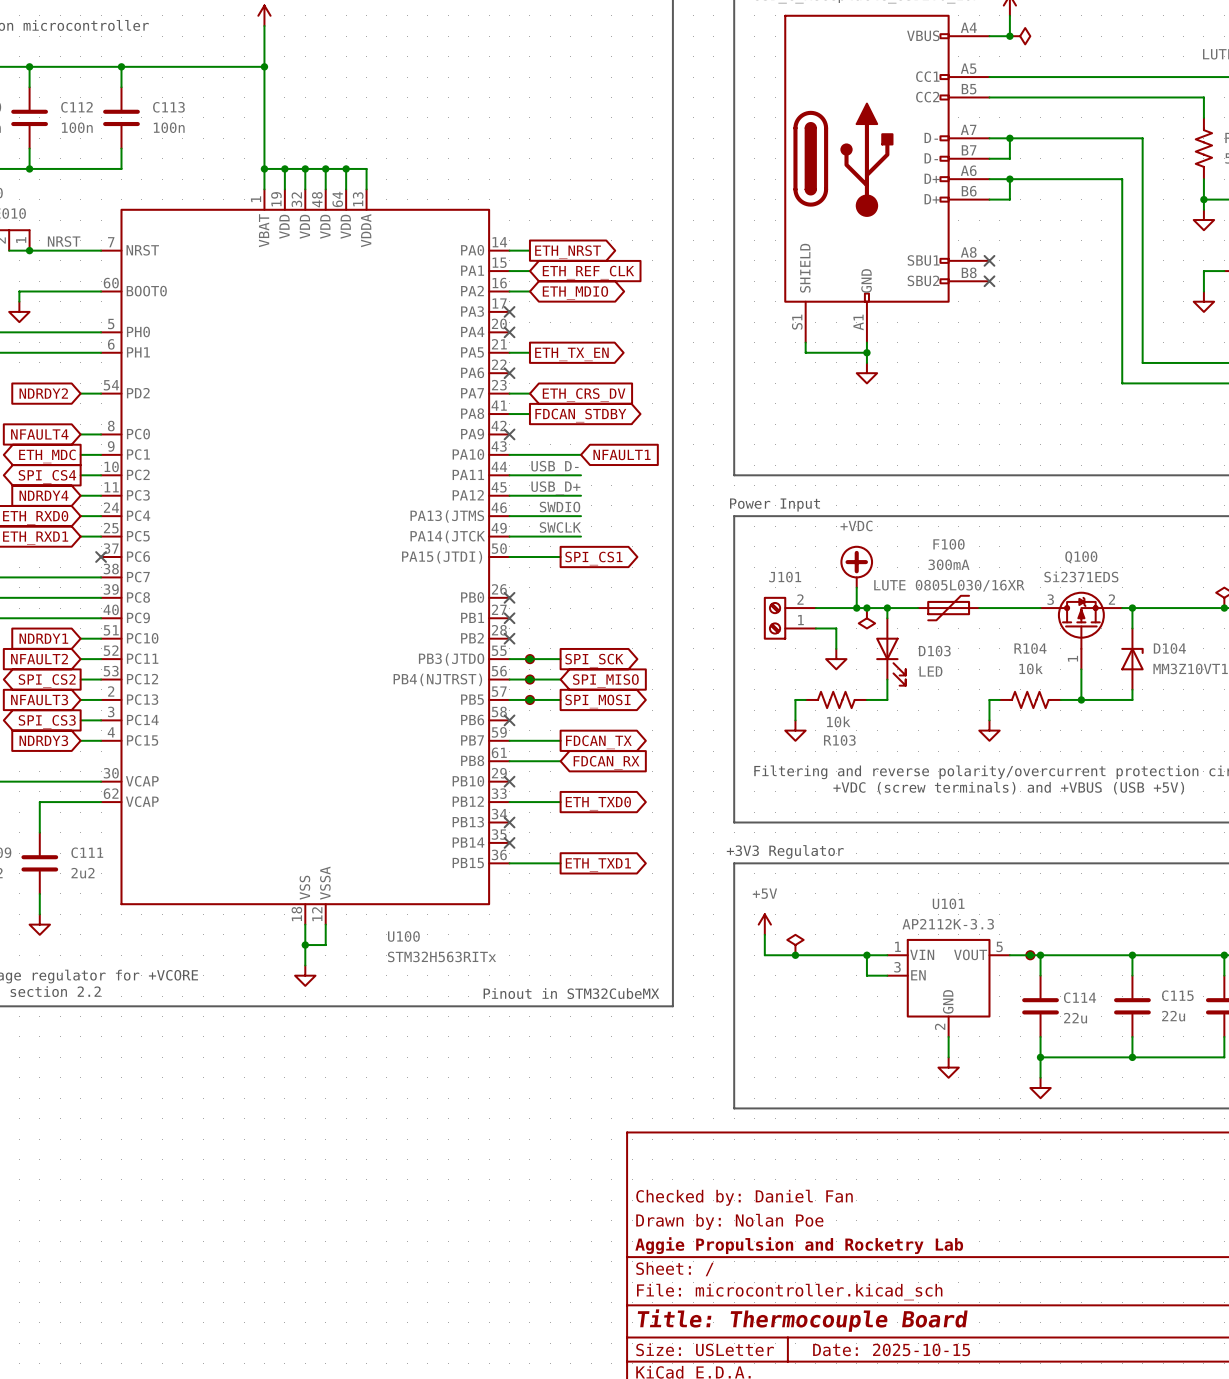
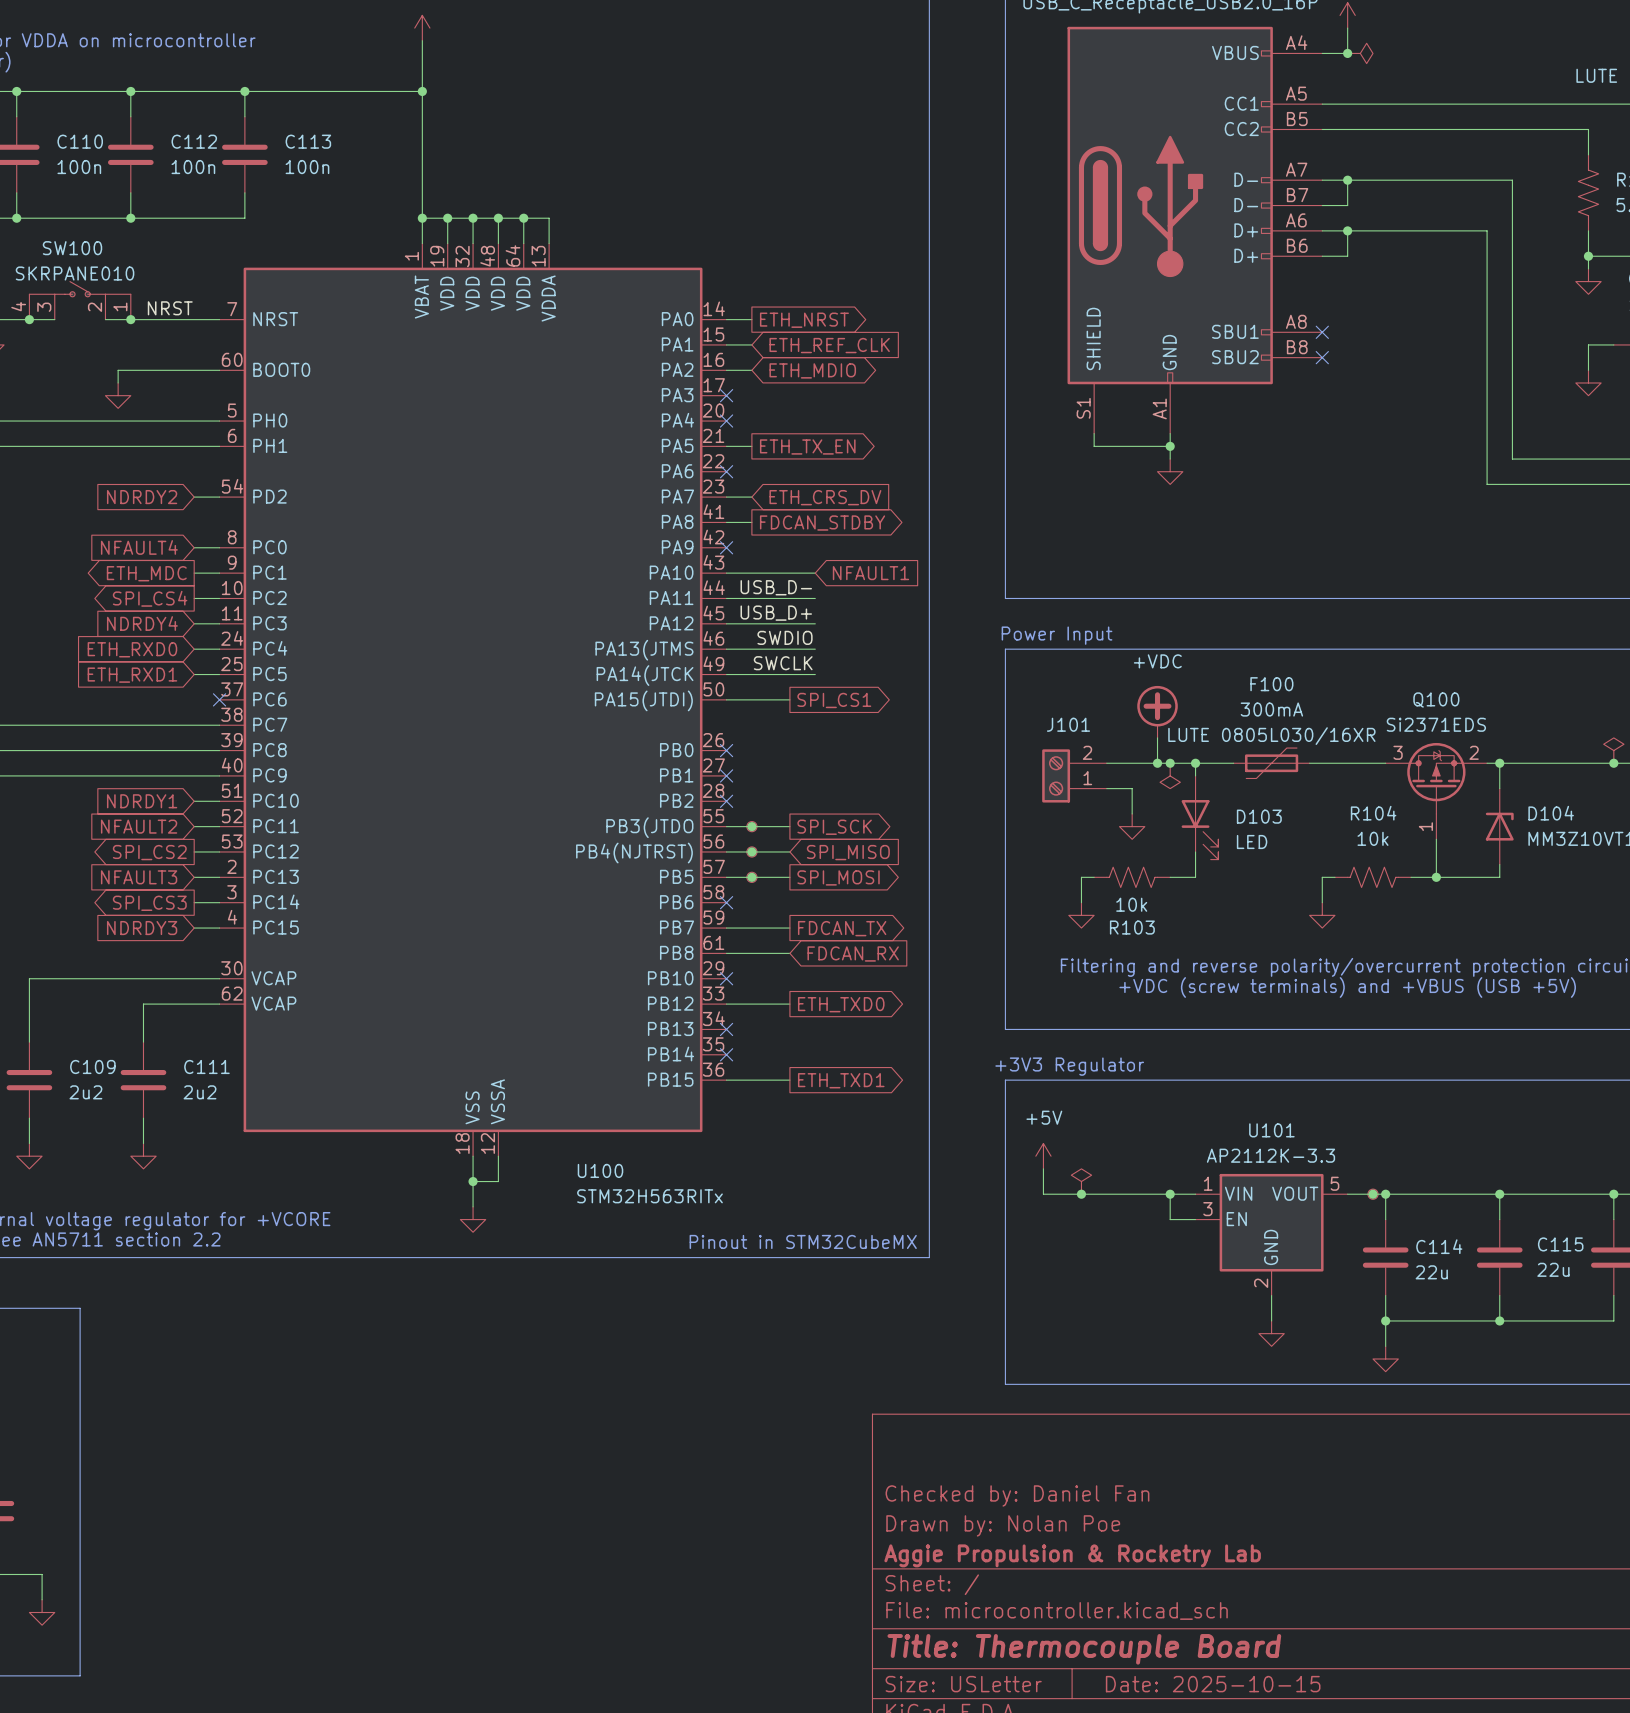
title block: Aggie Propulsion and Rocketry Lab (799, 1245) -> Aggie Propulsion & Rocketry Lab (1072, 1555)

